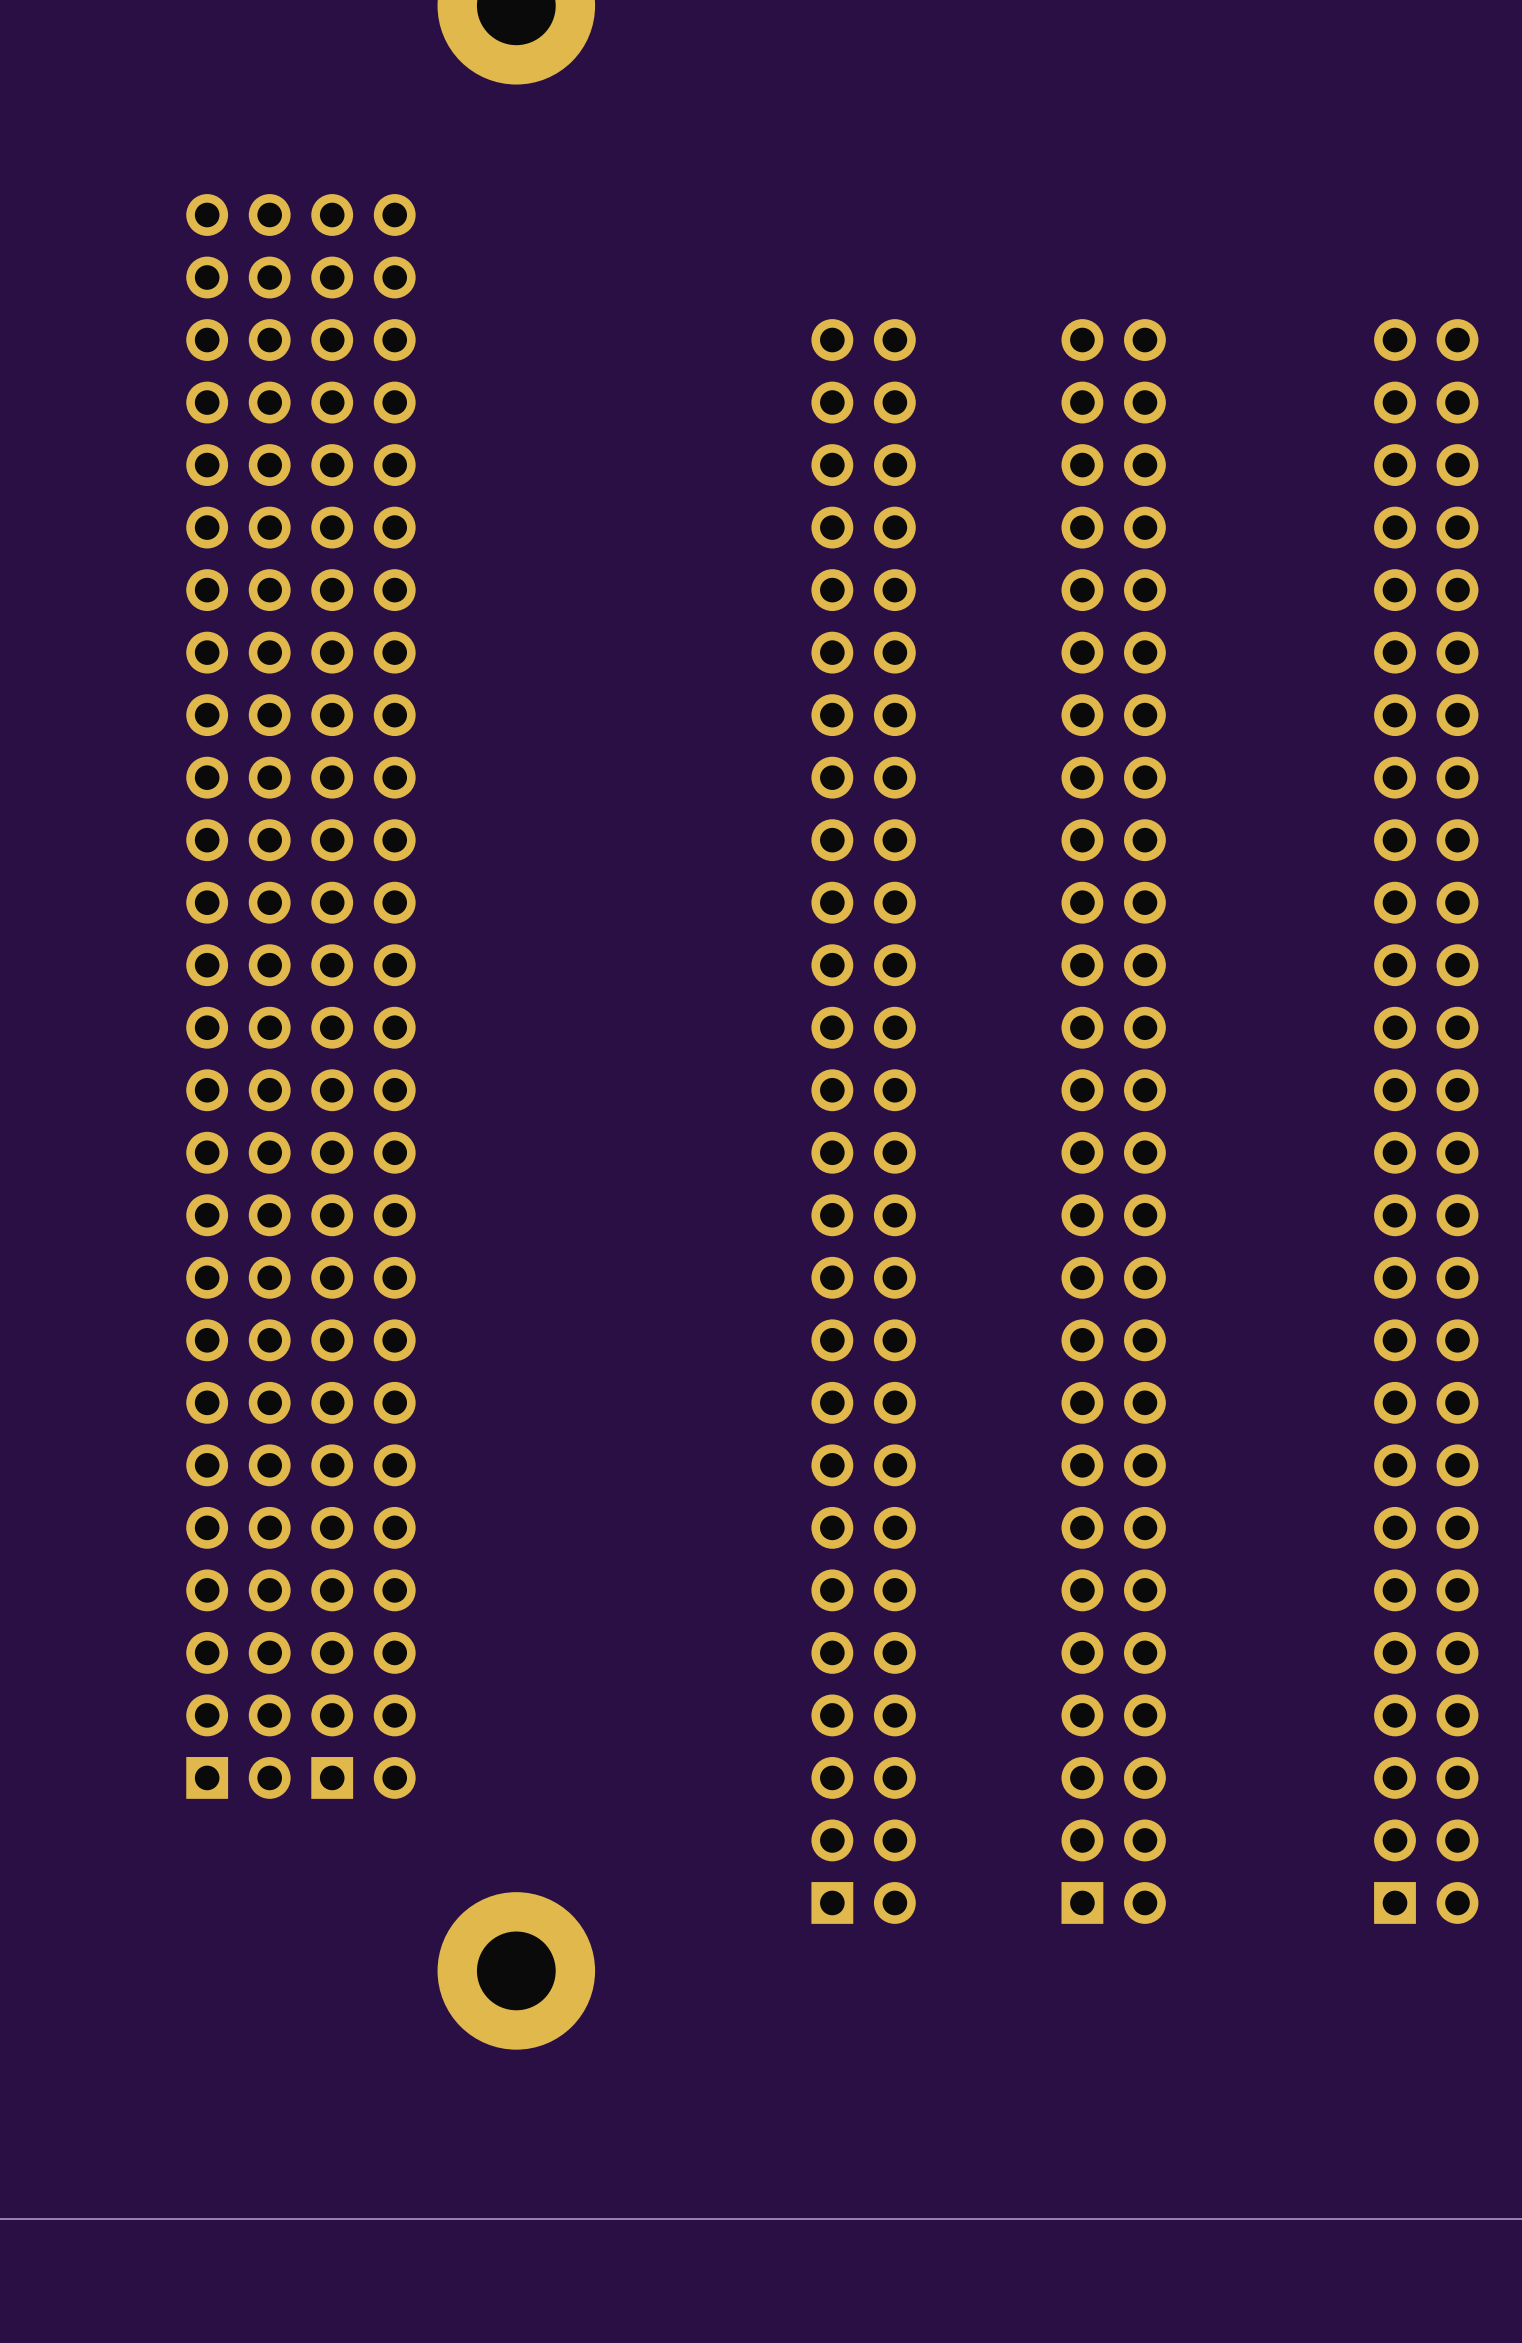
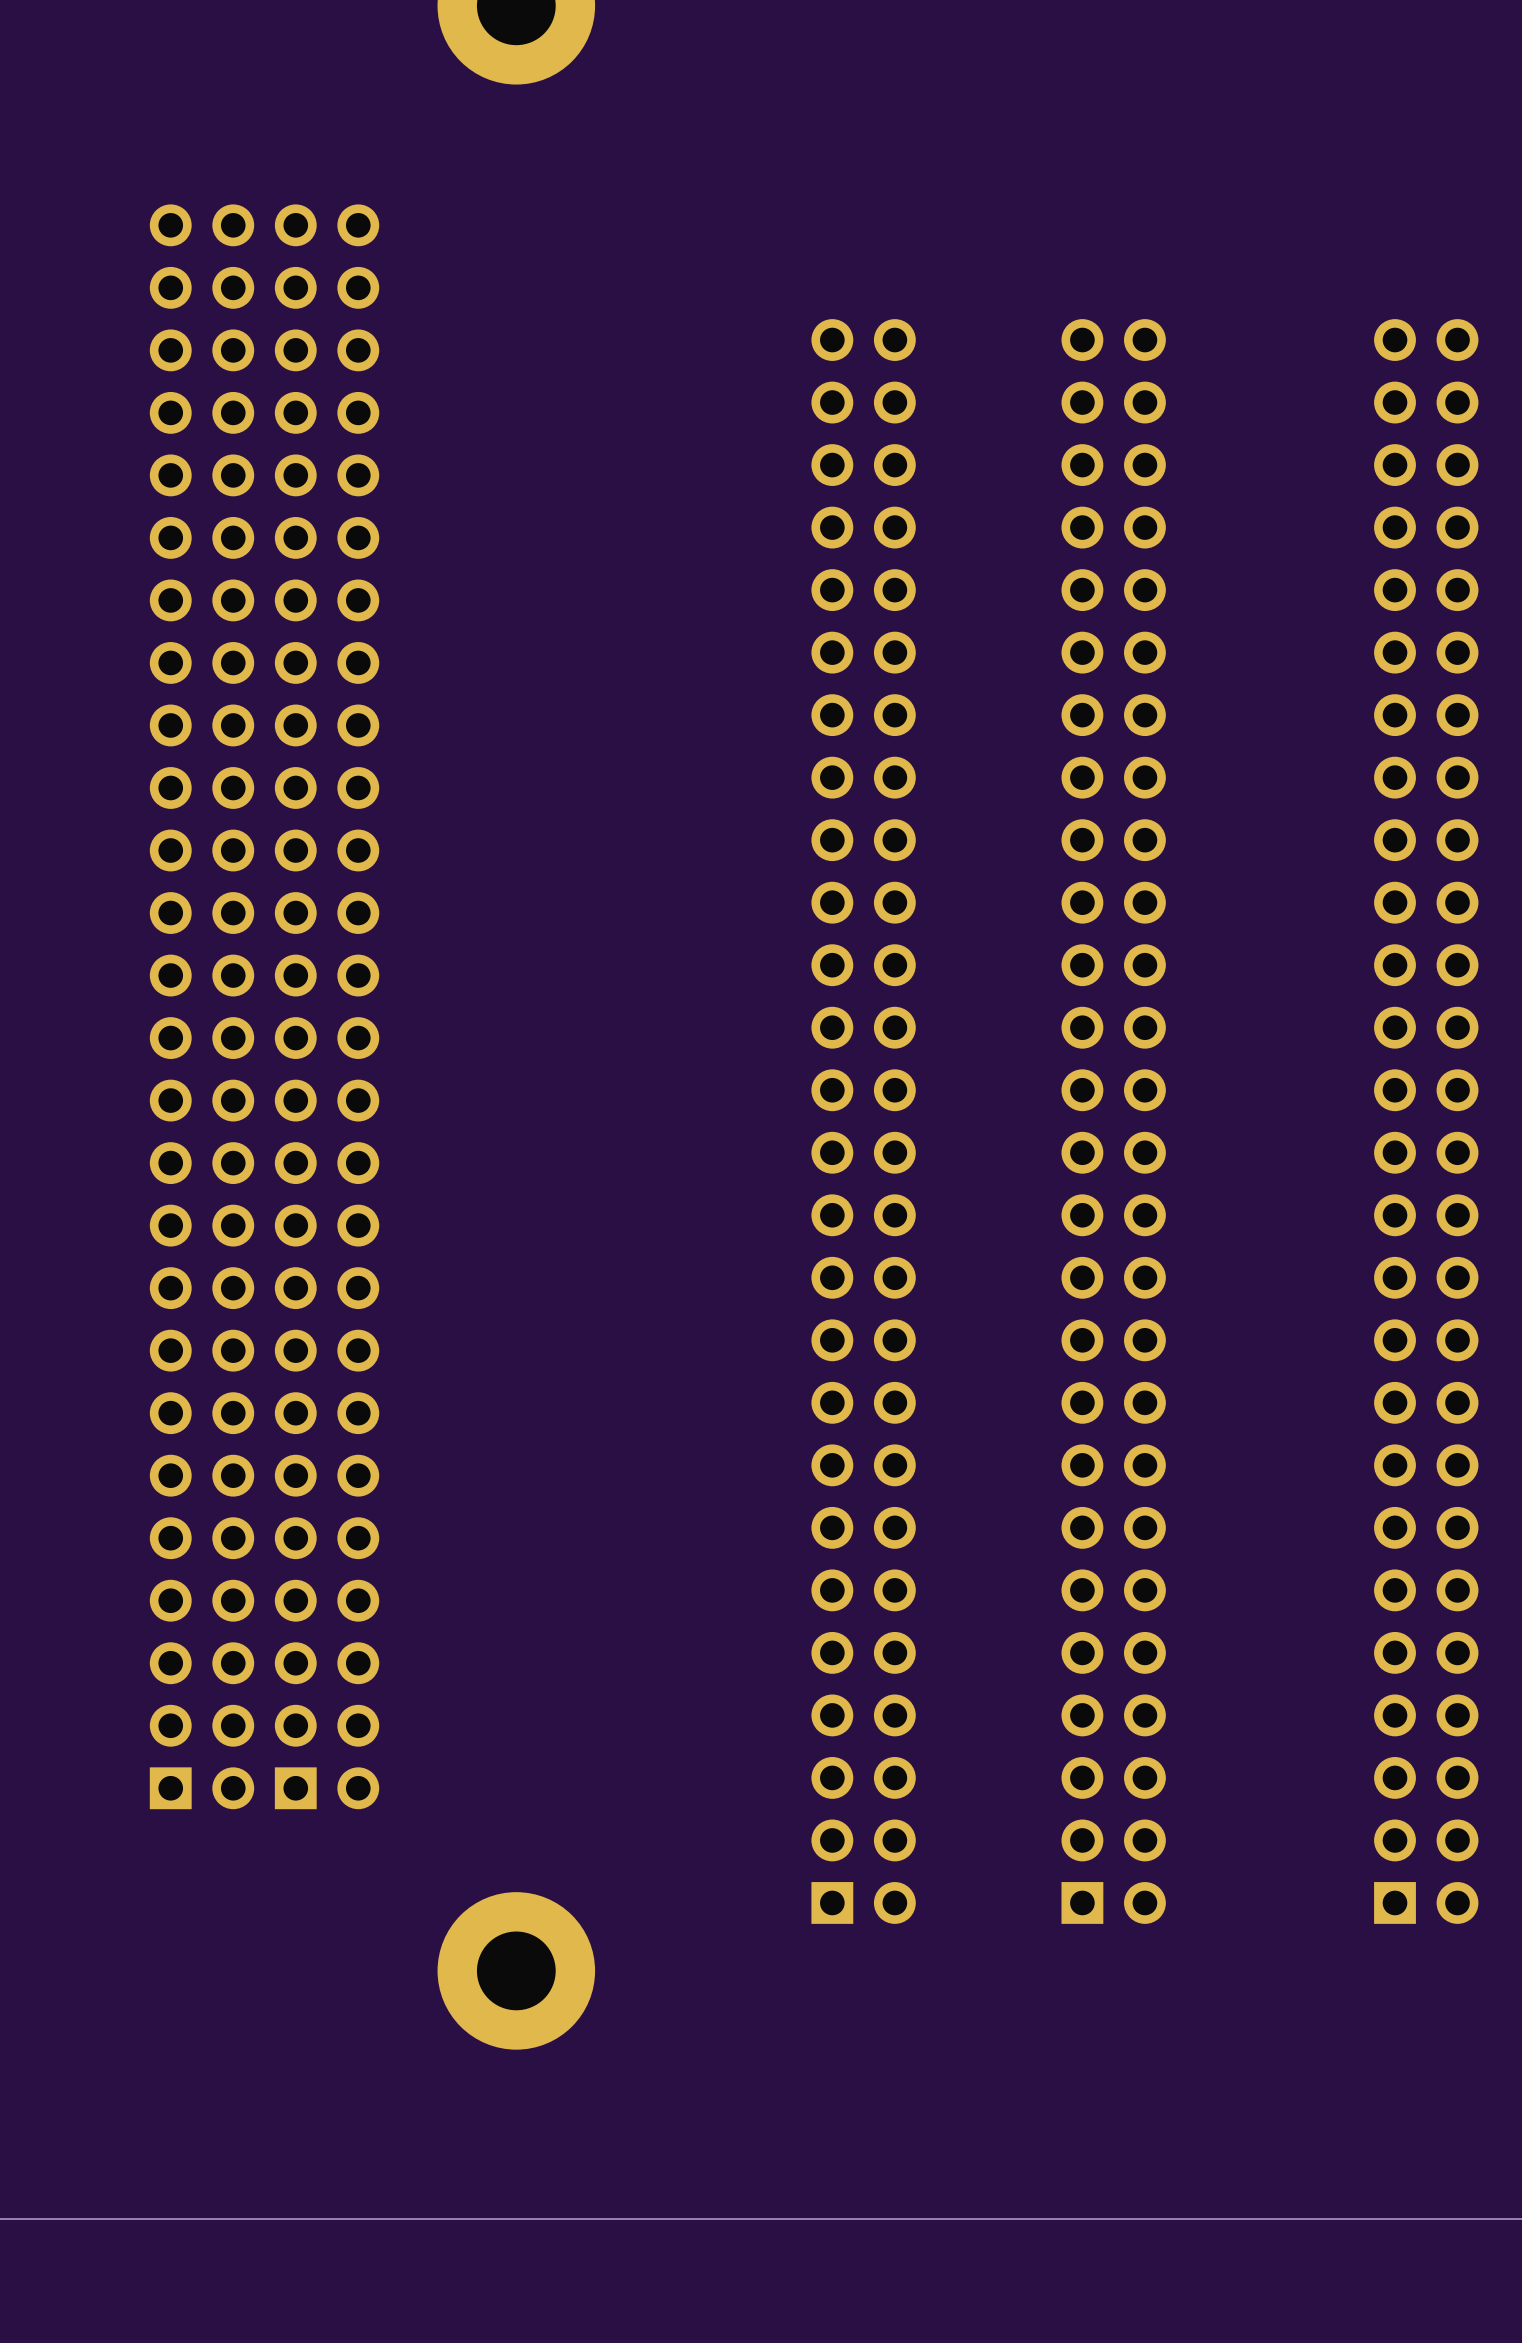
part position: (238, 996) -> (202, 1006)
part position: (363, 996) -> (327, 1006)

